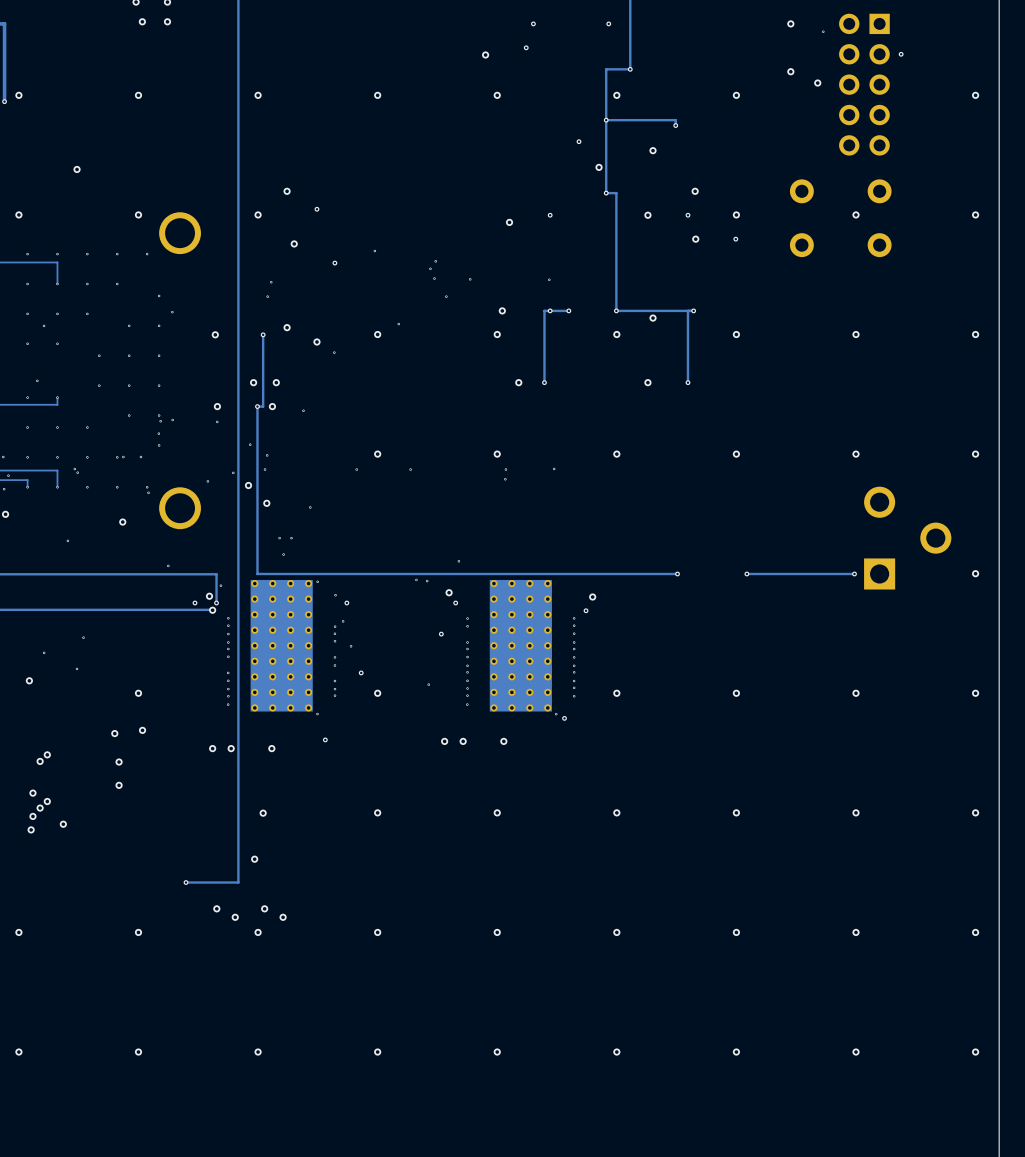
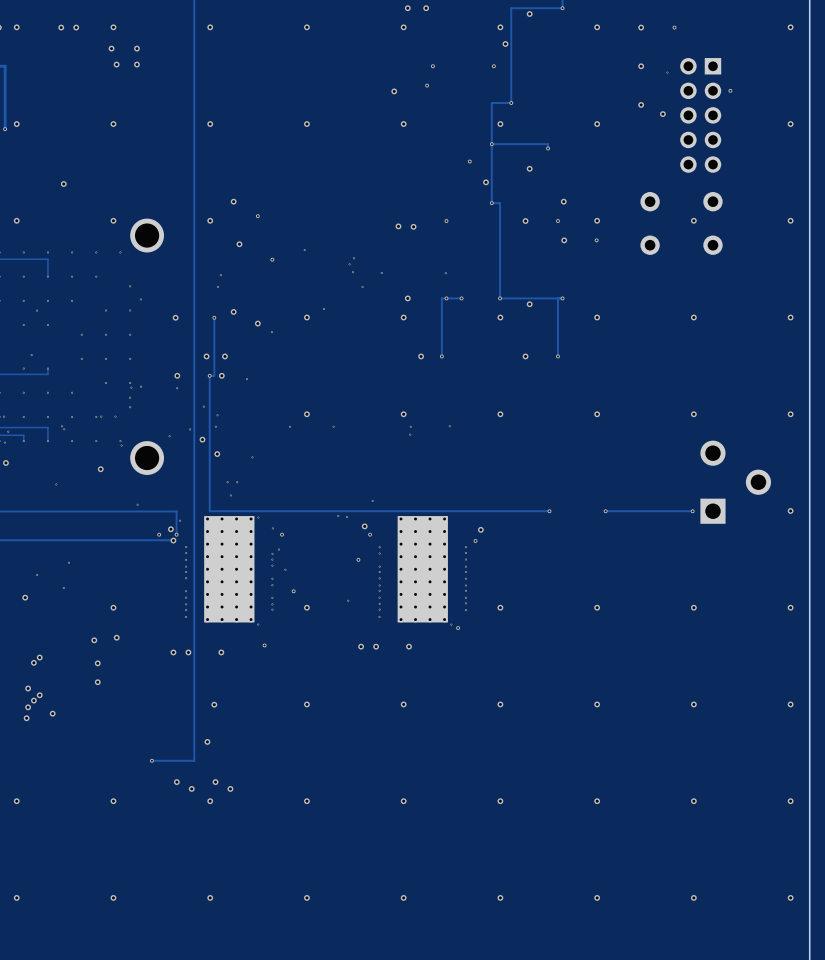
via: none -> (398, 226)

